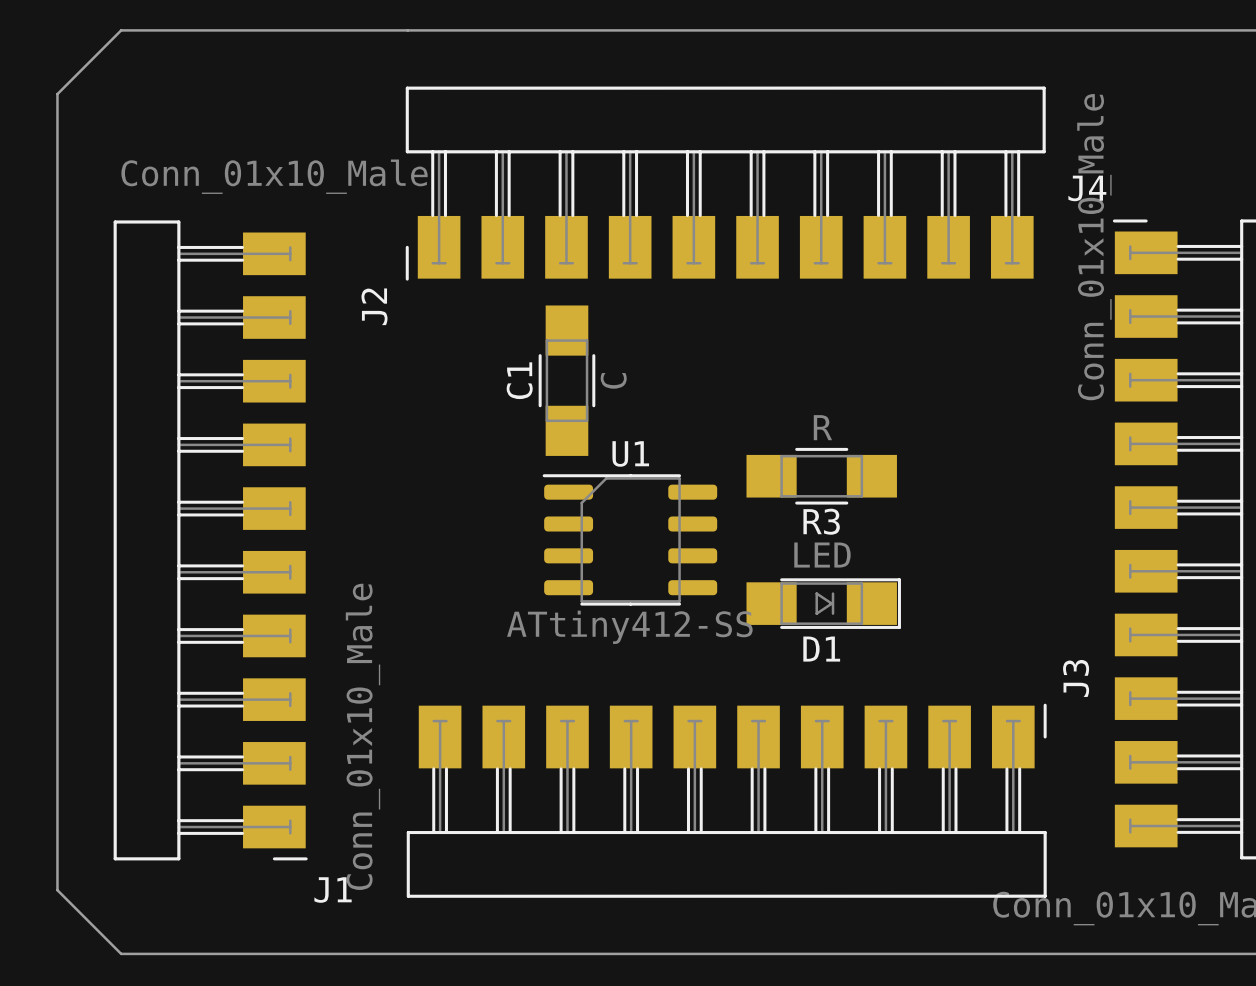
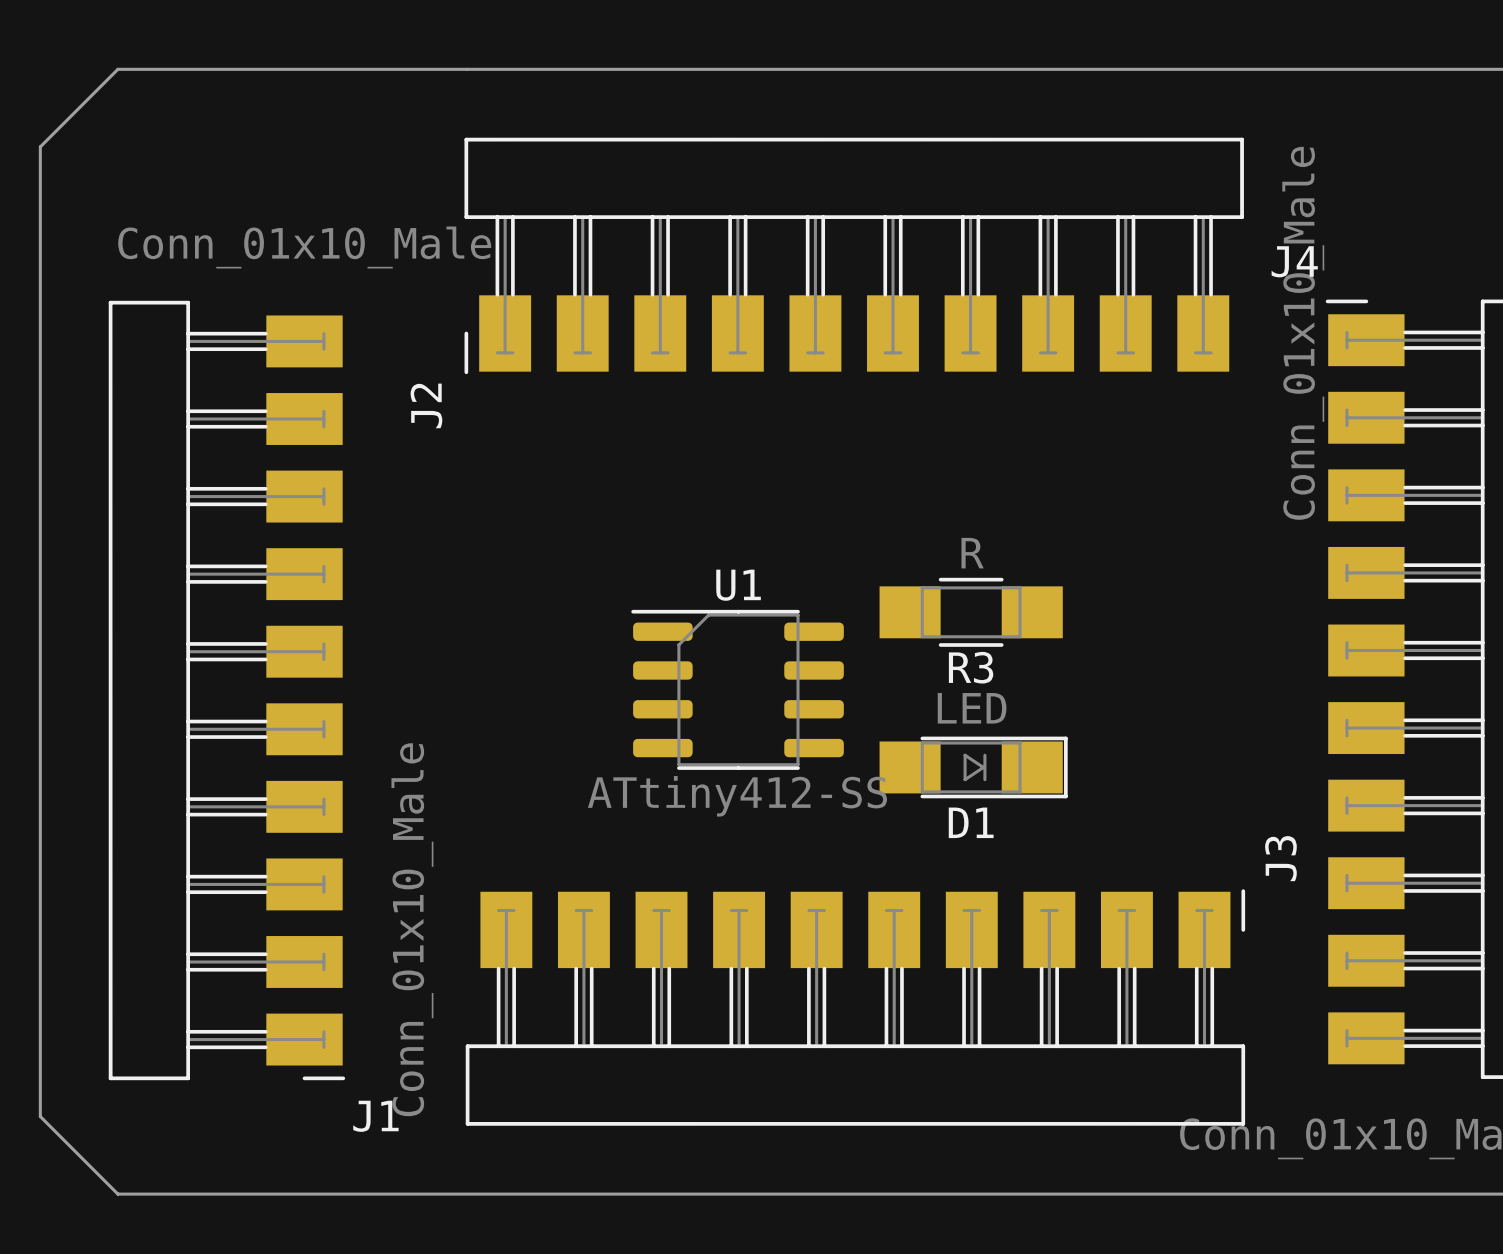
C1: C (566, 380) -> none

